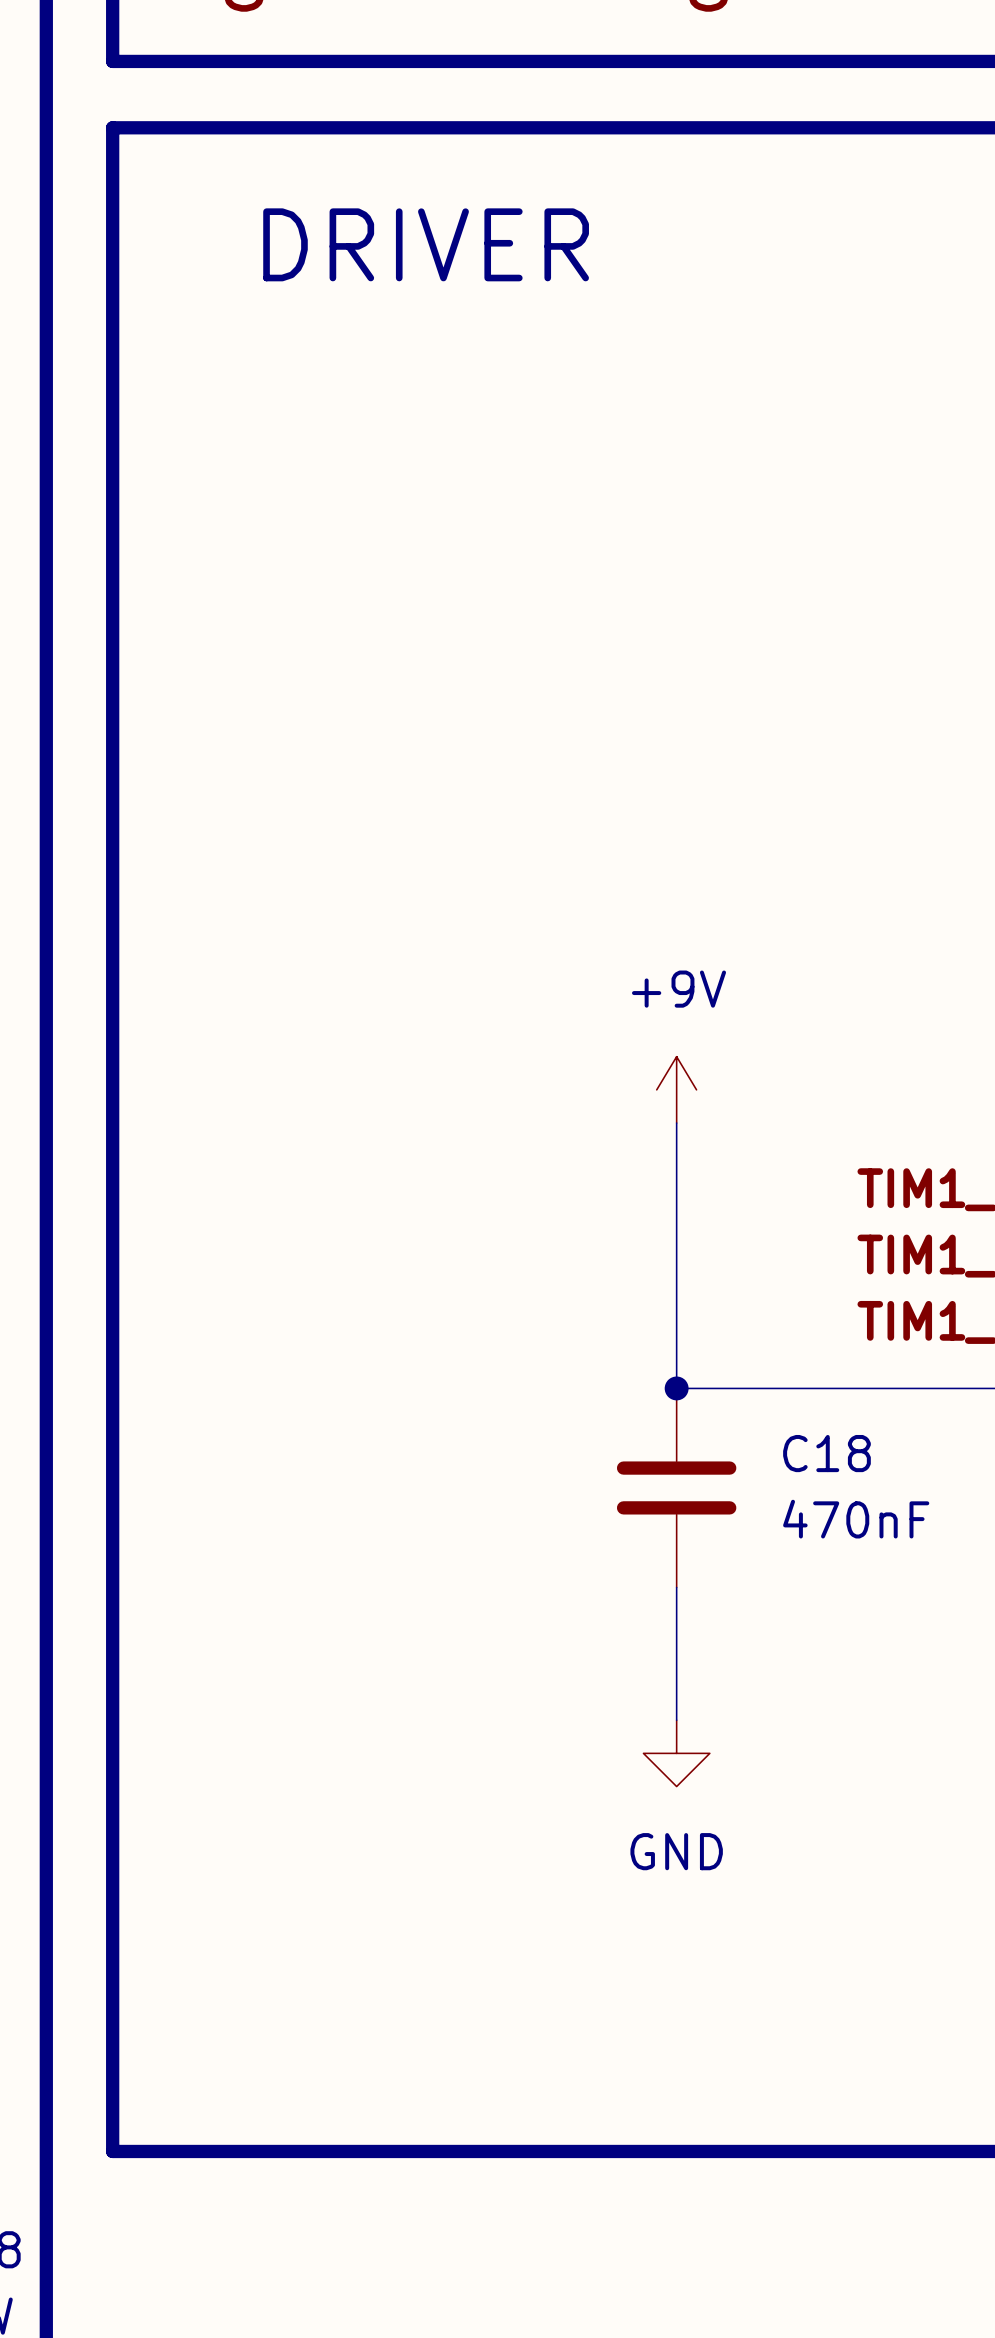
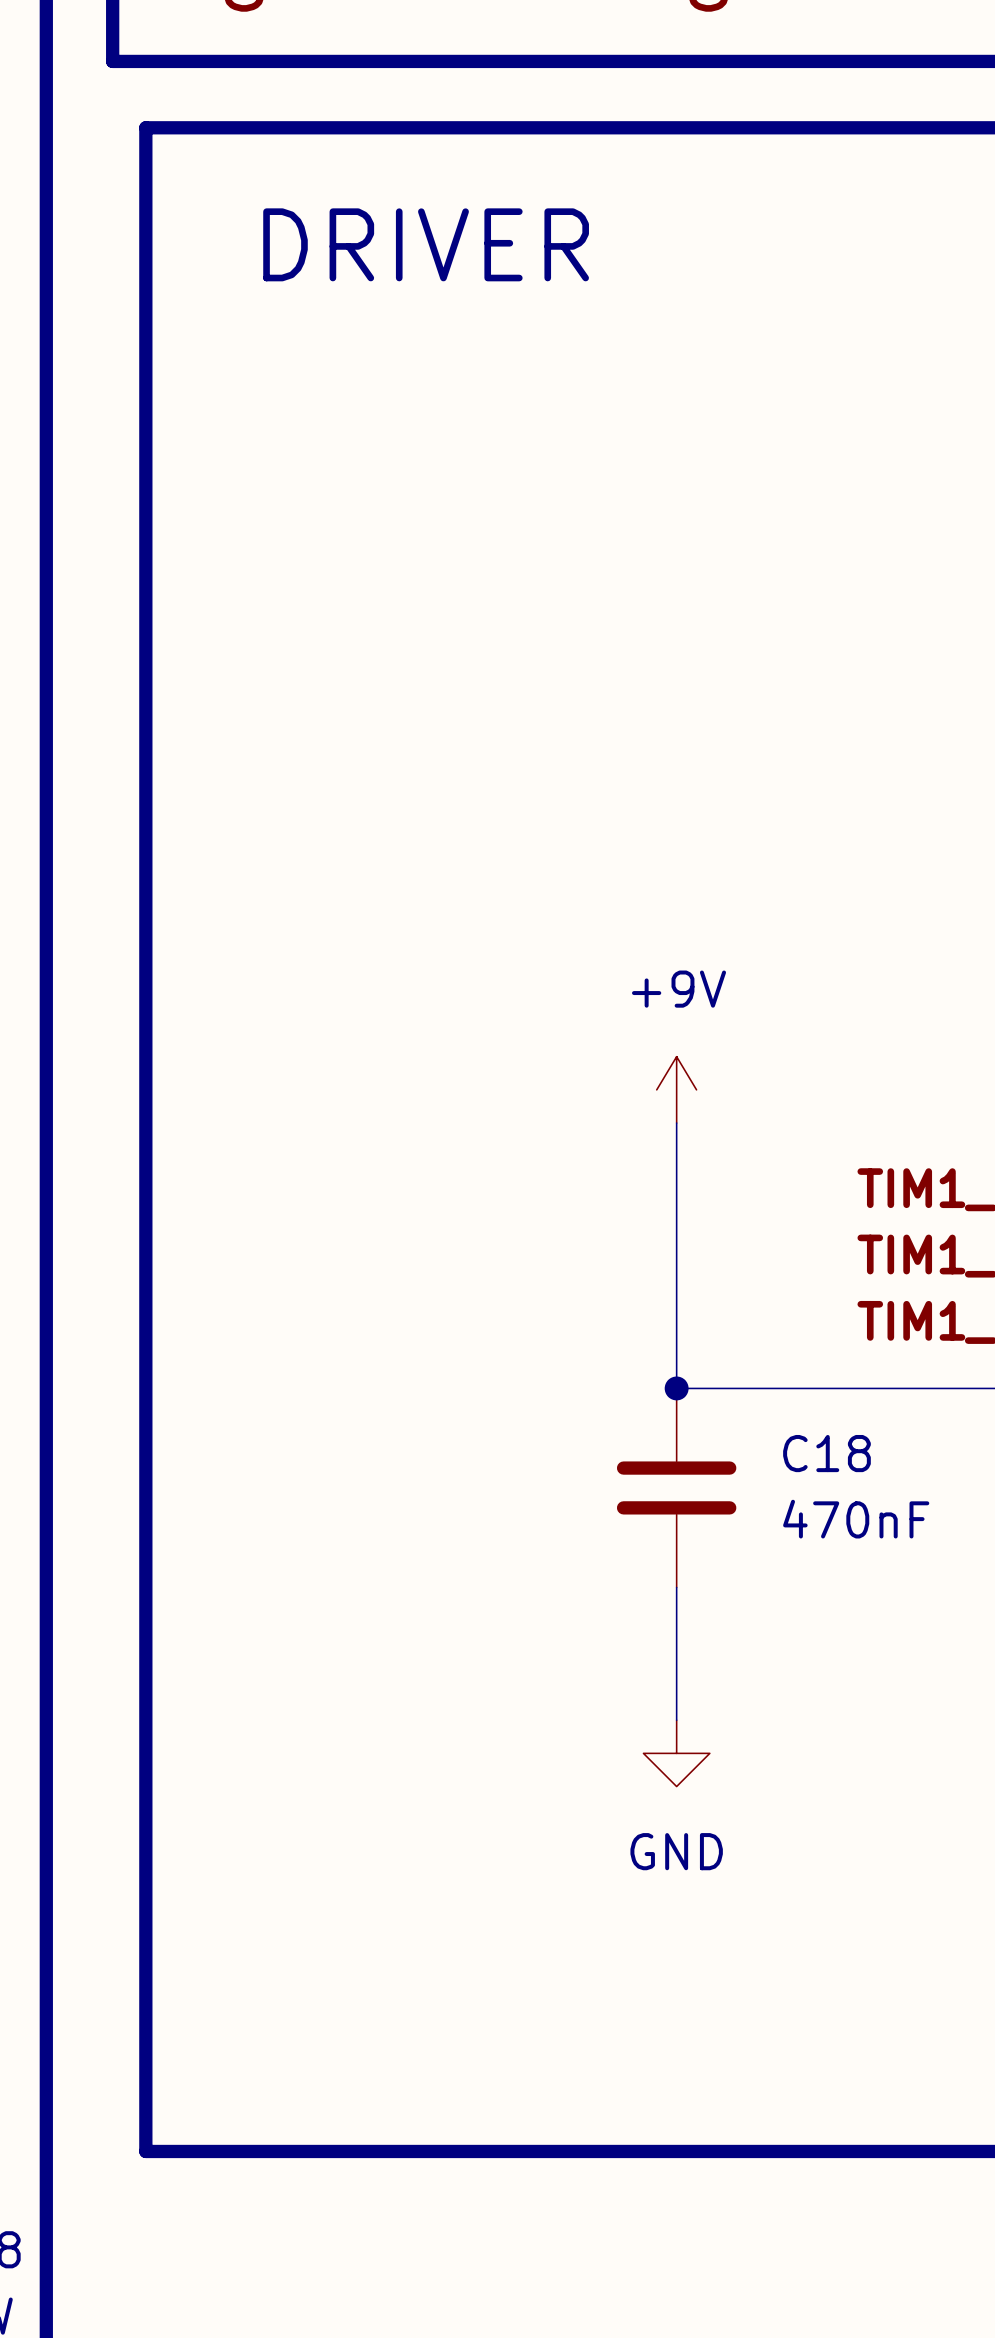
line: (145, 127) (112, 127) (112, 2151) (145, 2151) -> (145, 127) (145, 2151)

